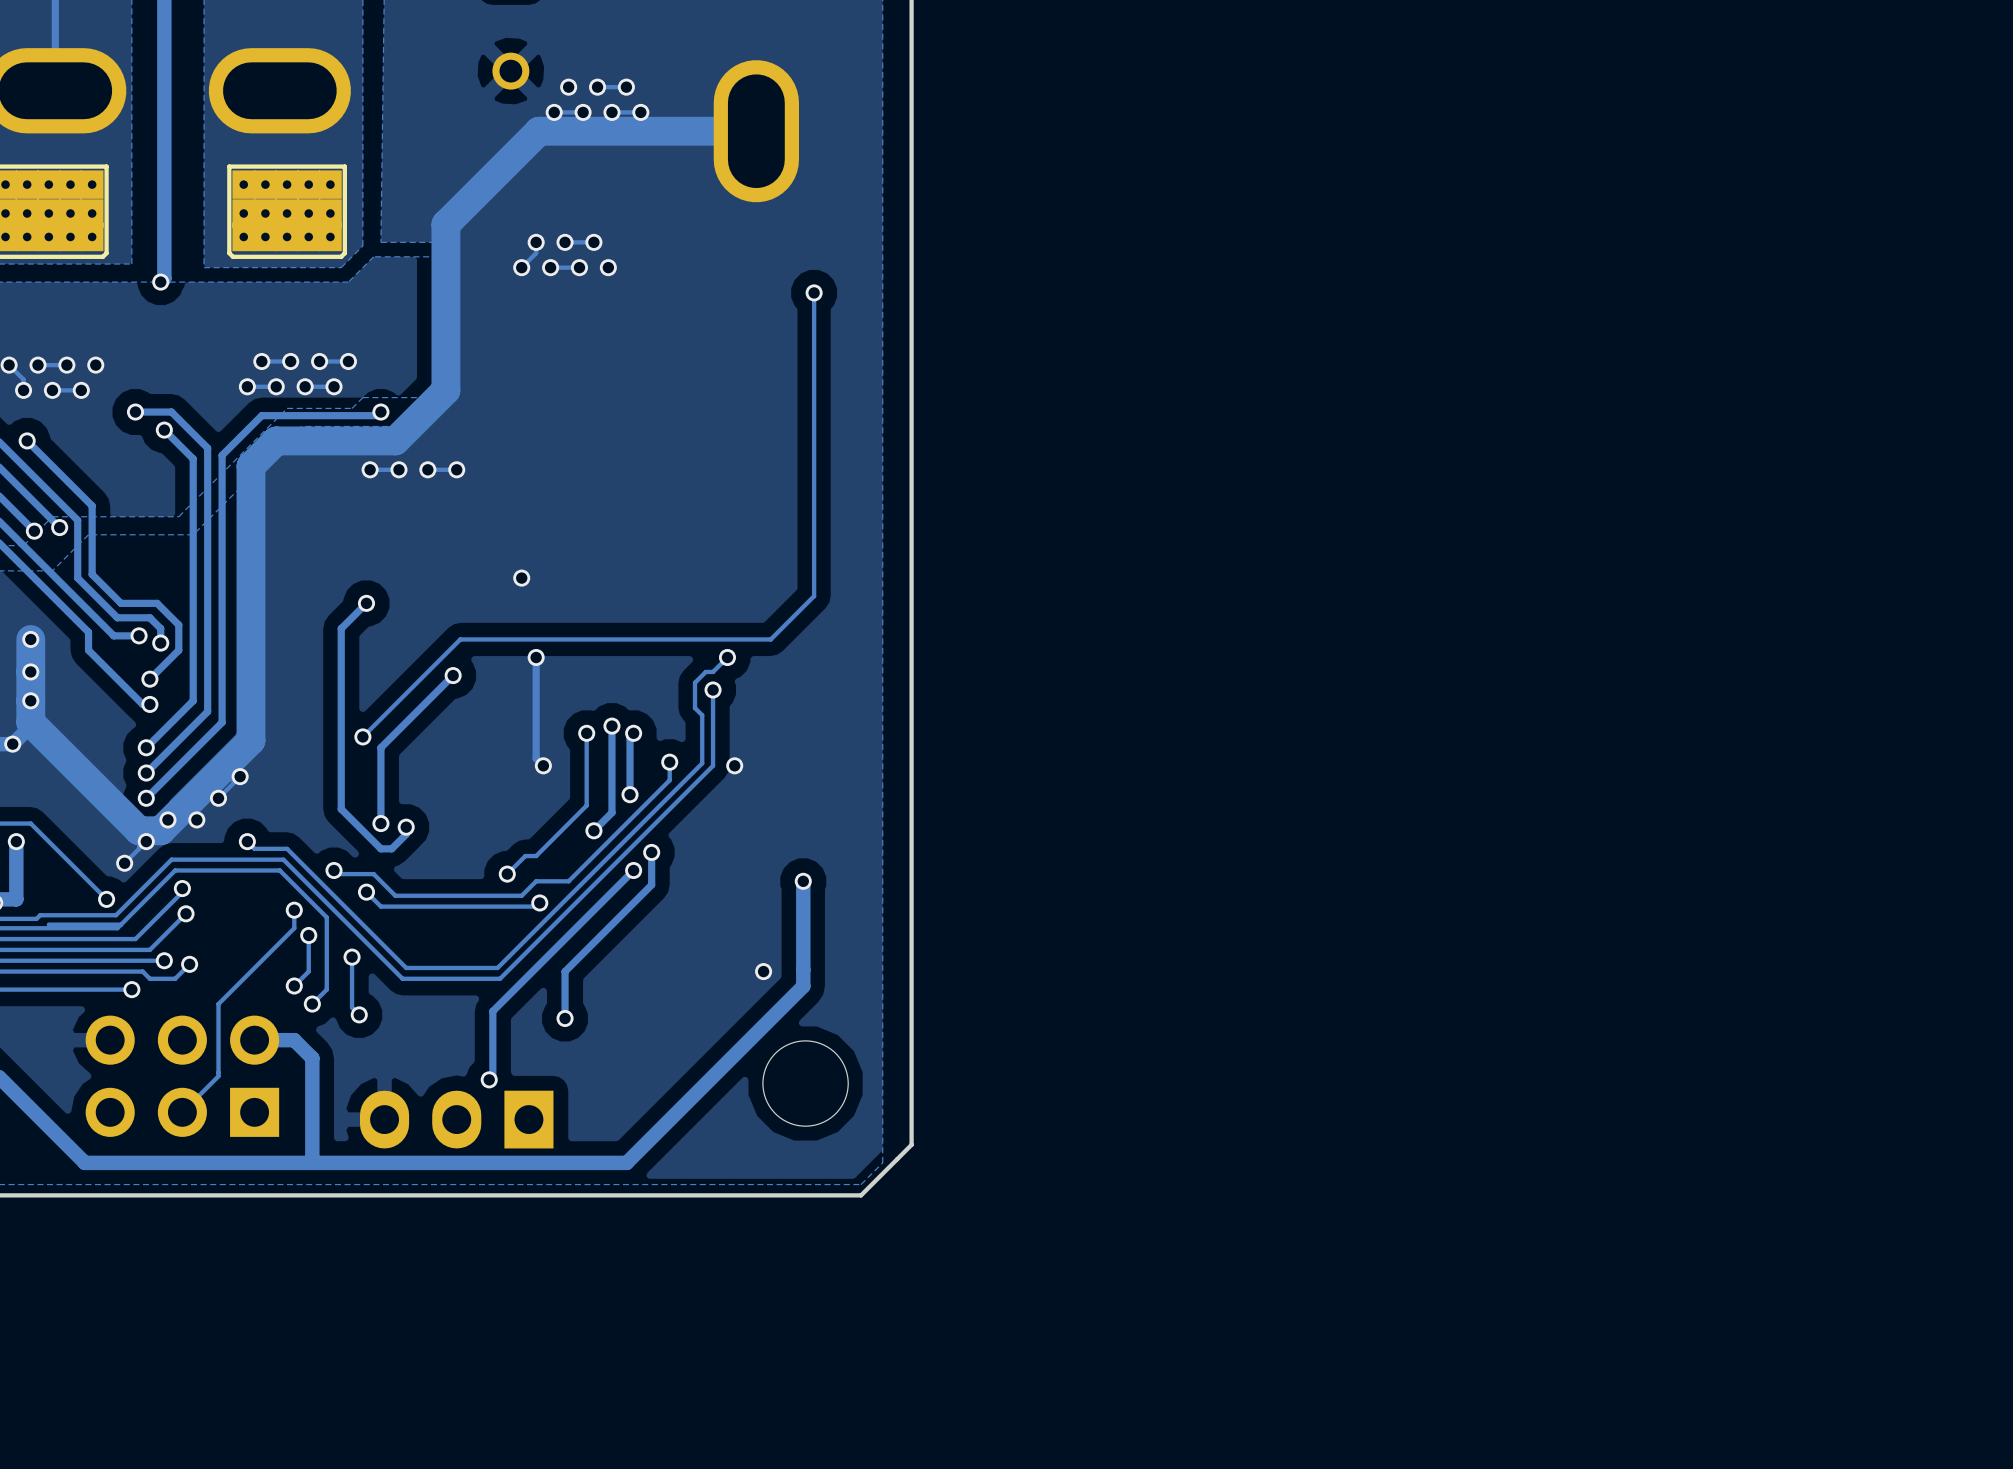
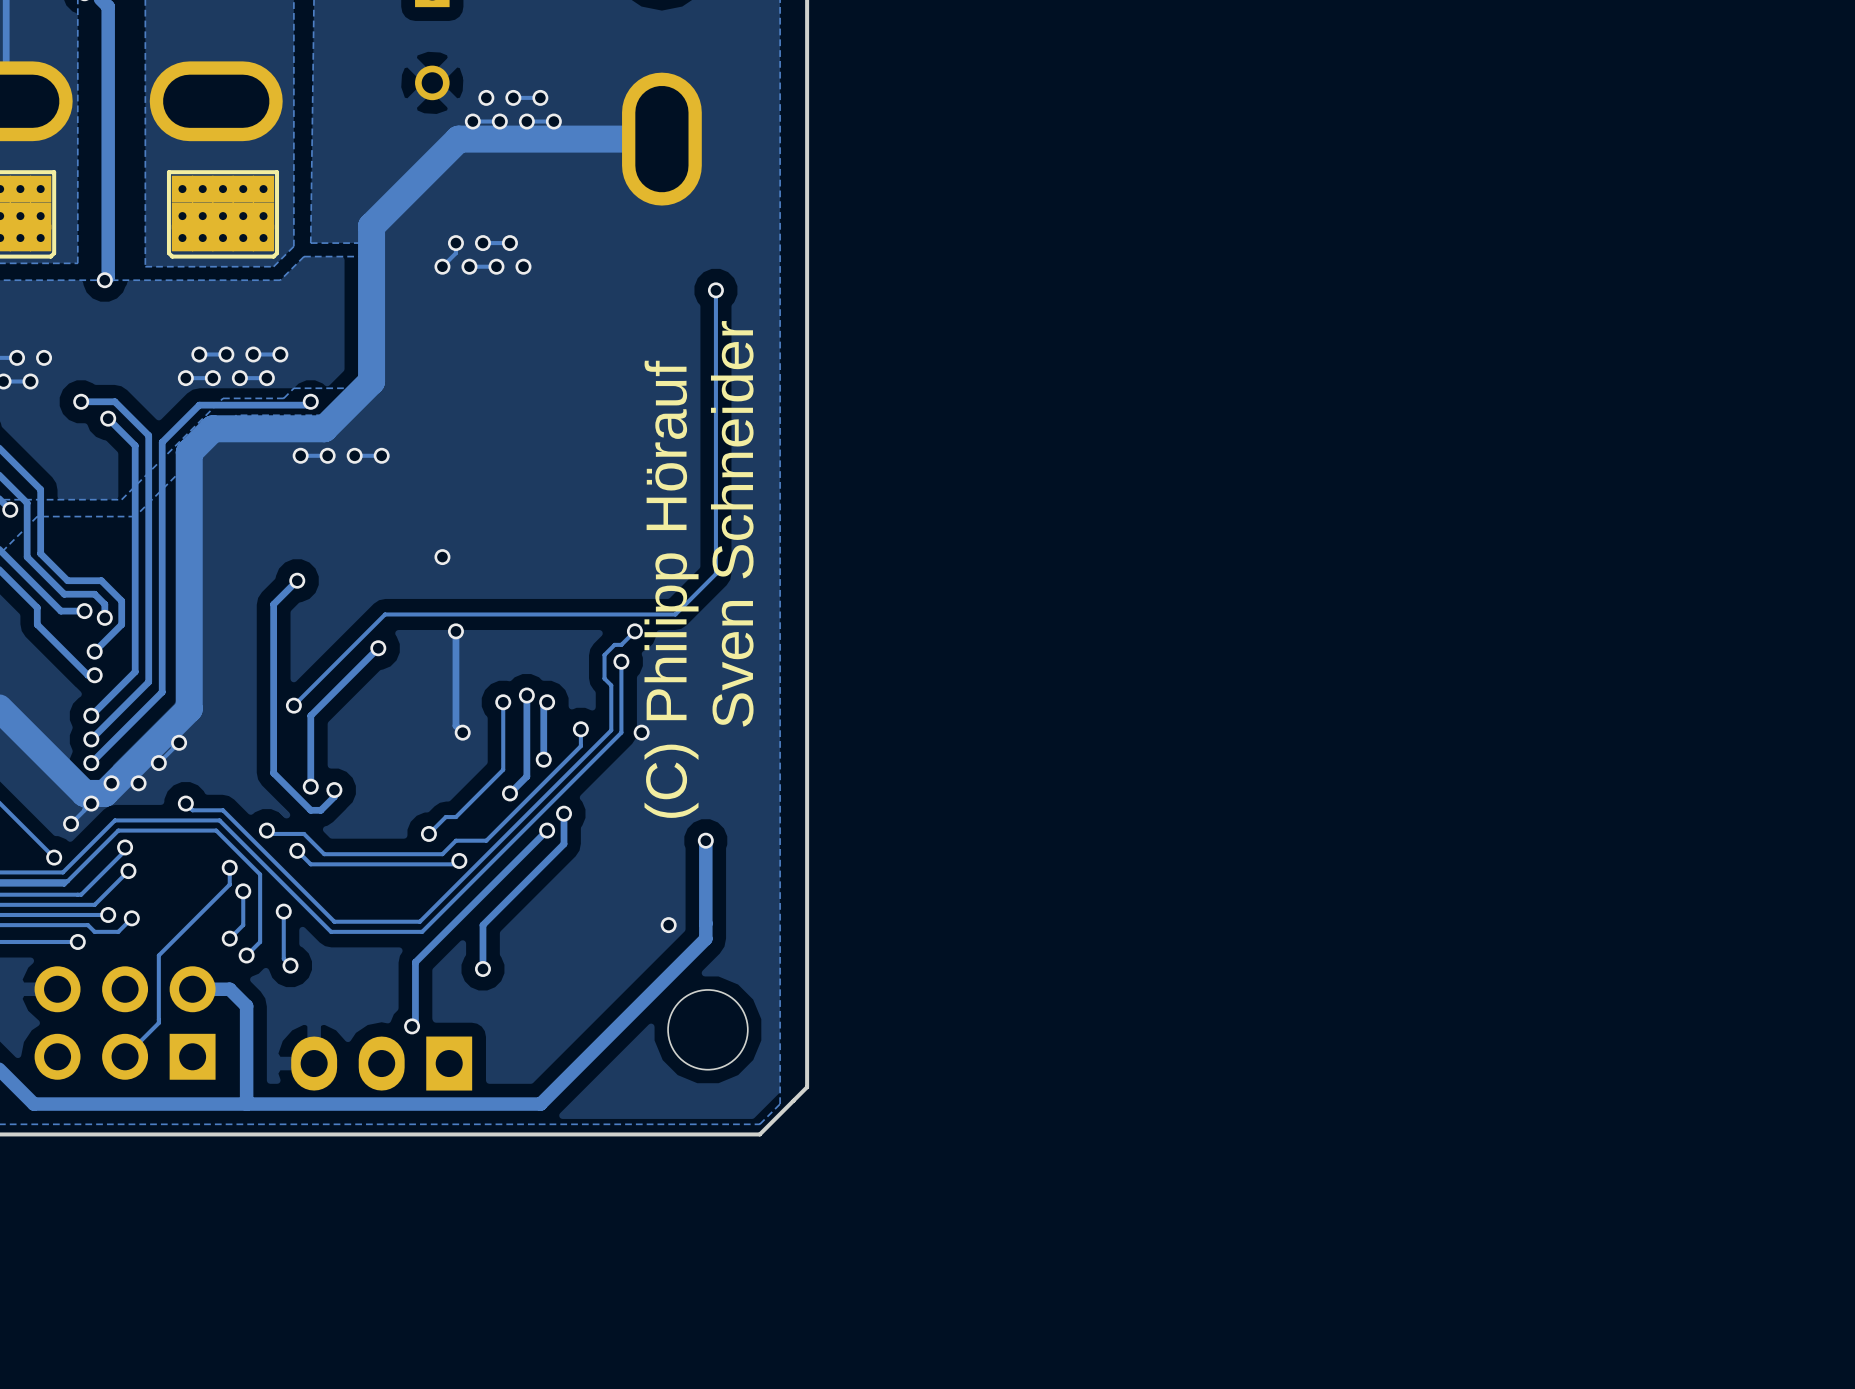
text: none -> Sven Schneider (732, 523)
text: none -> (C) Philipp Hörauf (671, 589)

